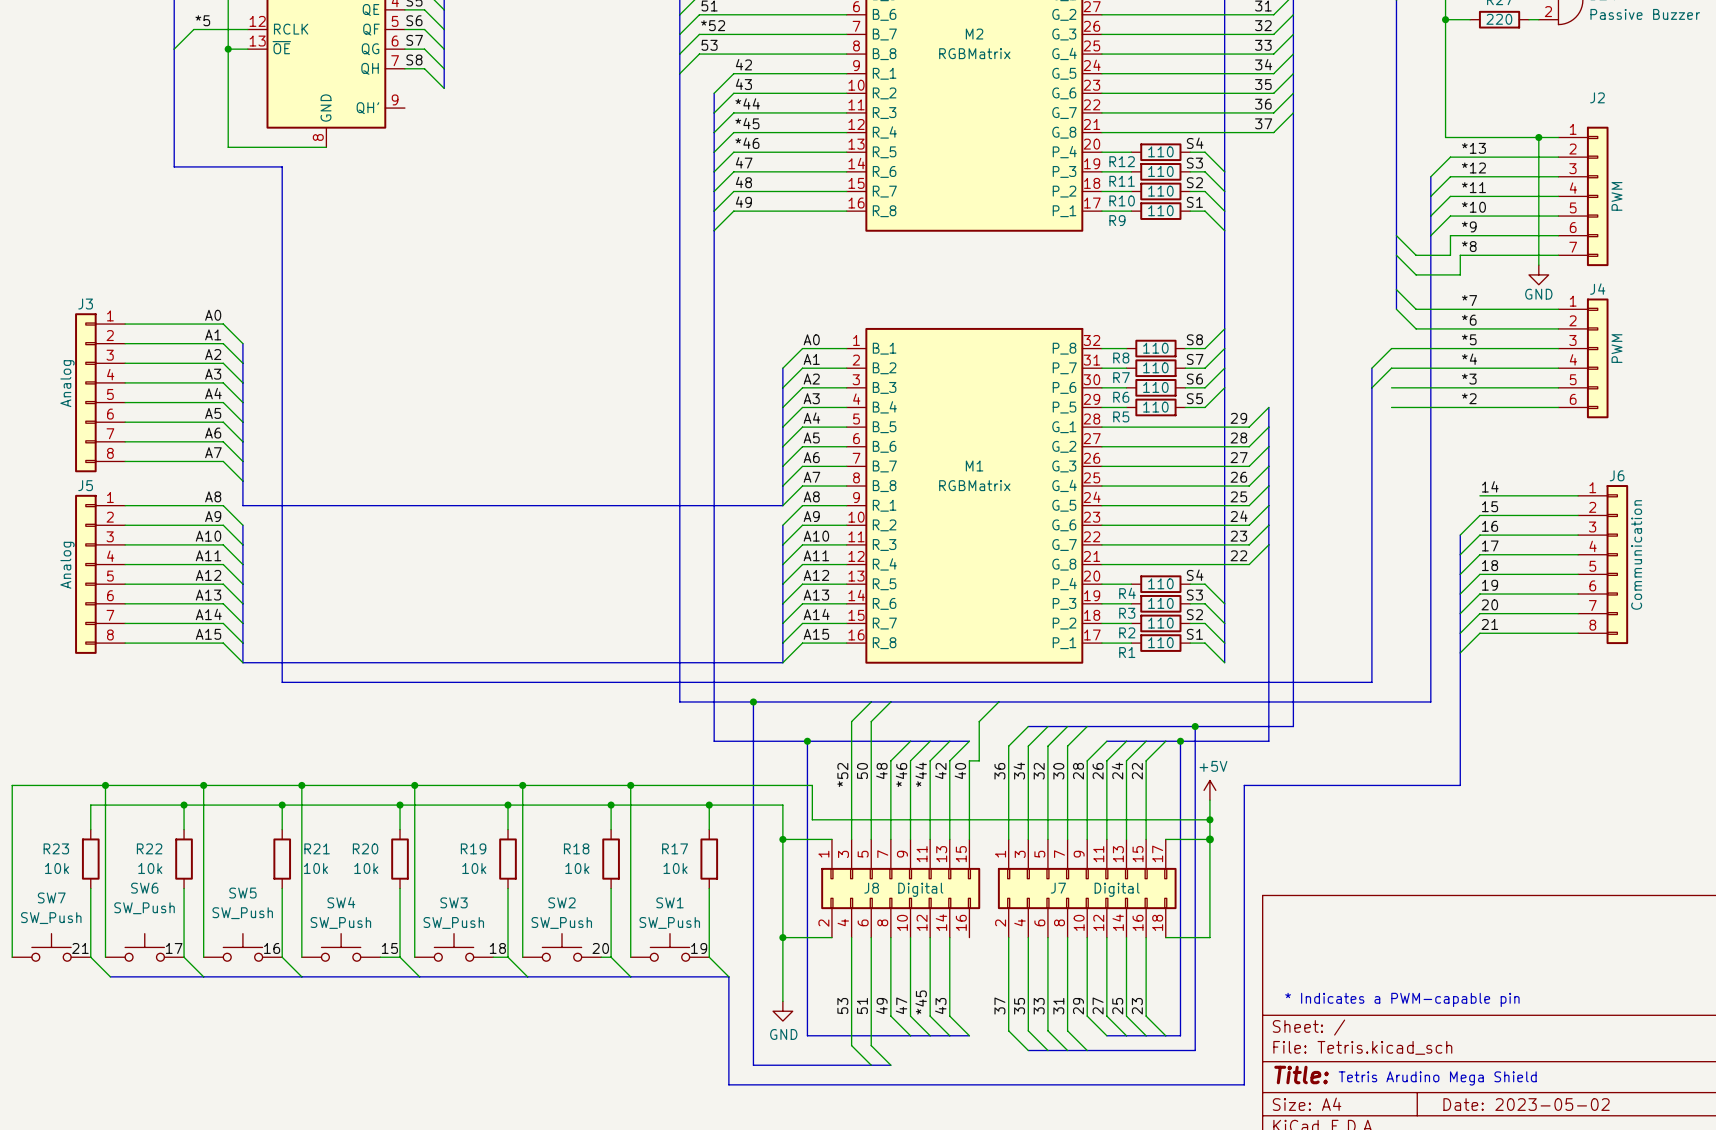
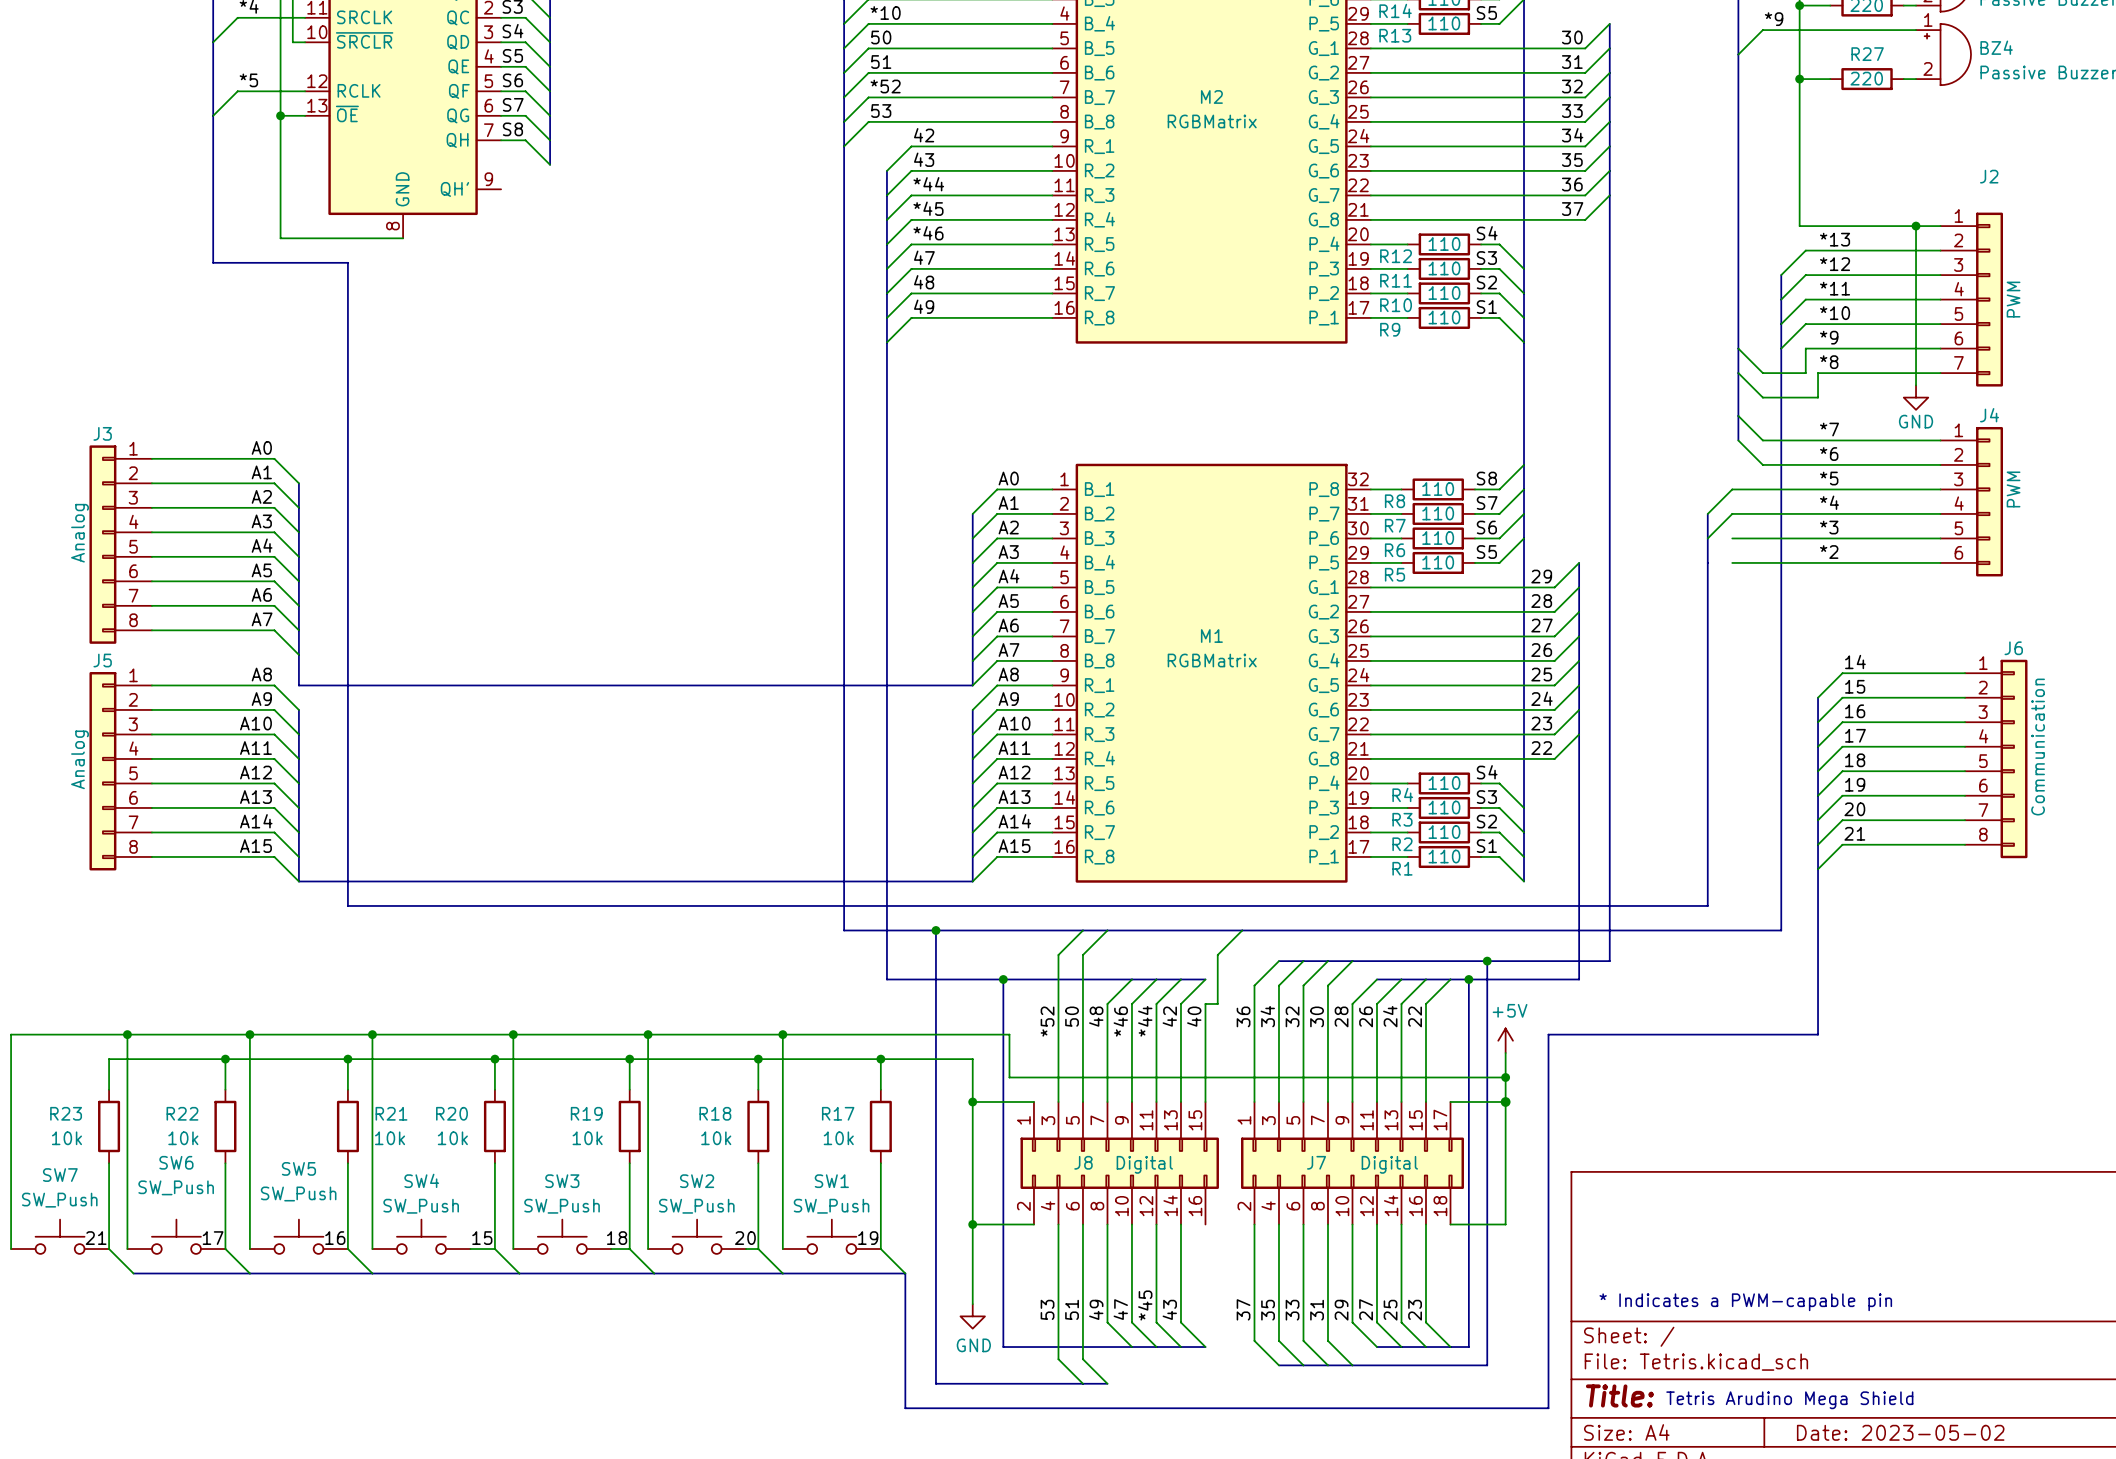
wire: none -> (1842, 673) (1818, 697)
bus: none -> (1818, 697) (1818, 722)

